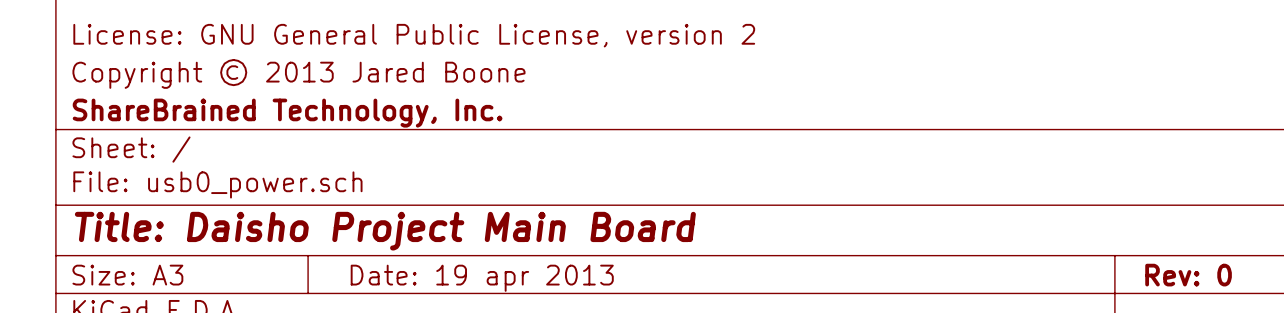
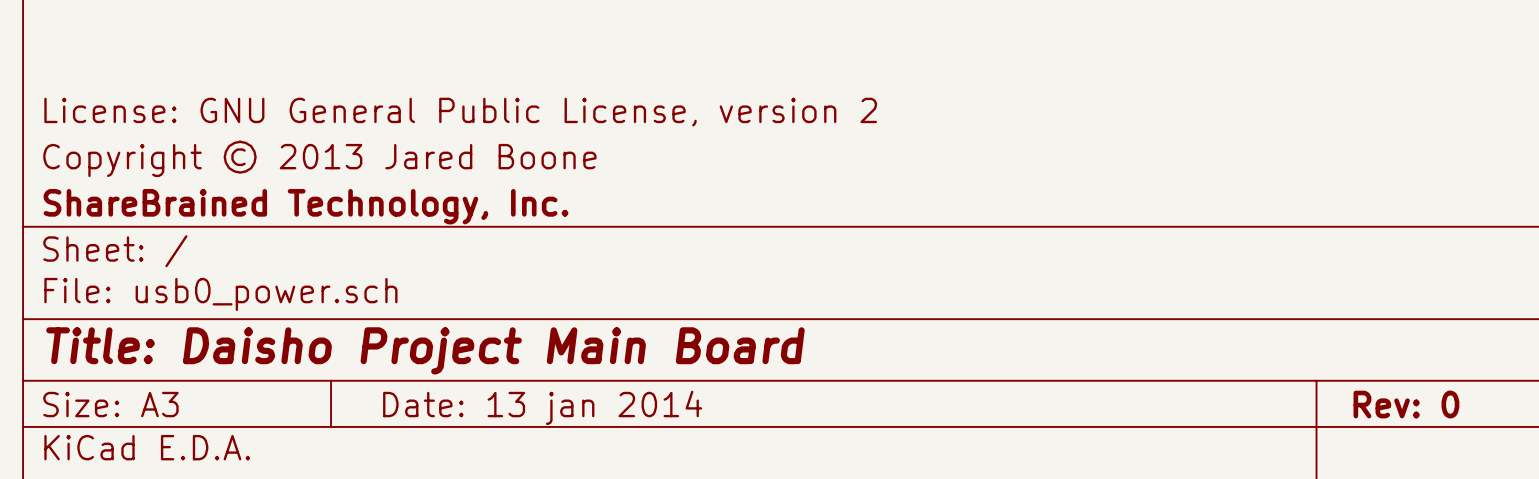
title block: Date: 19 apr 2013 (482, 278) -> Date: 13 jan 2014 (542, 407)

